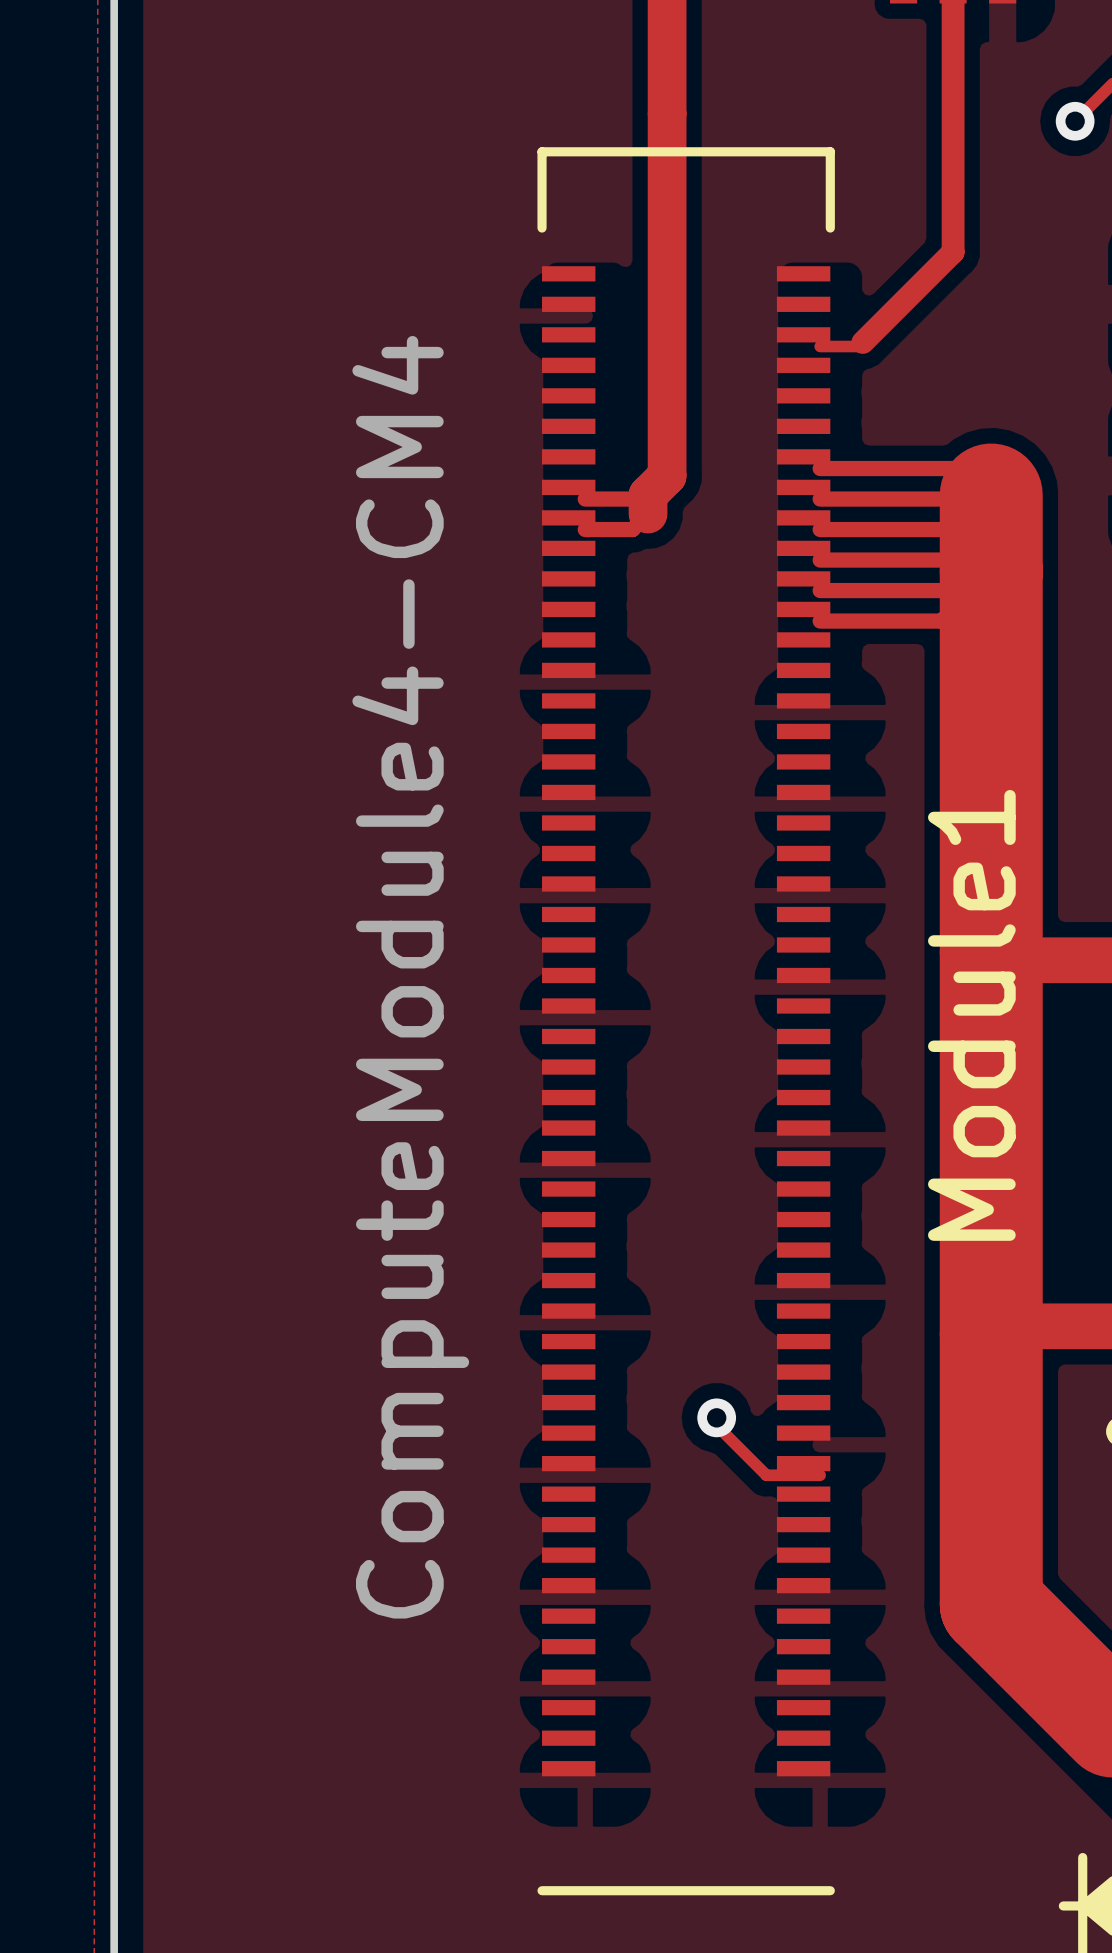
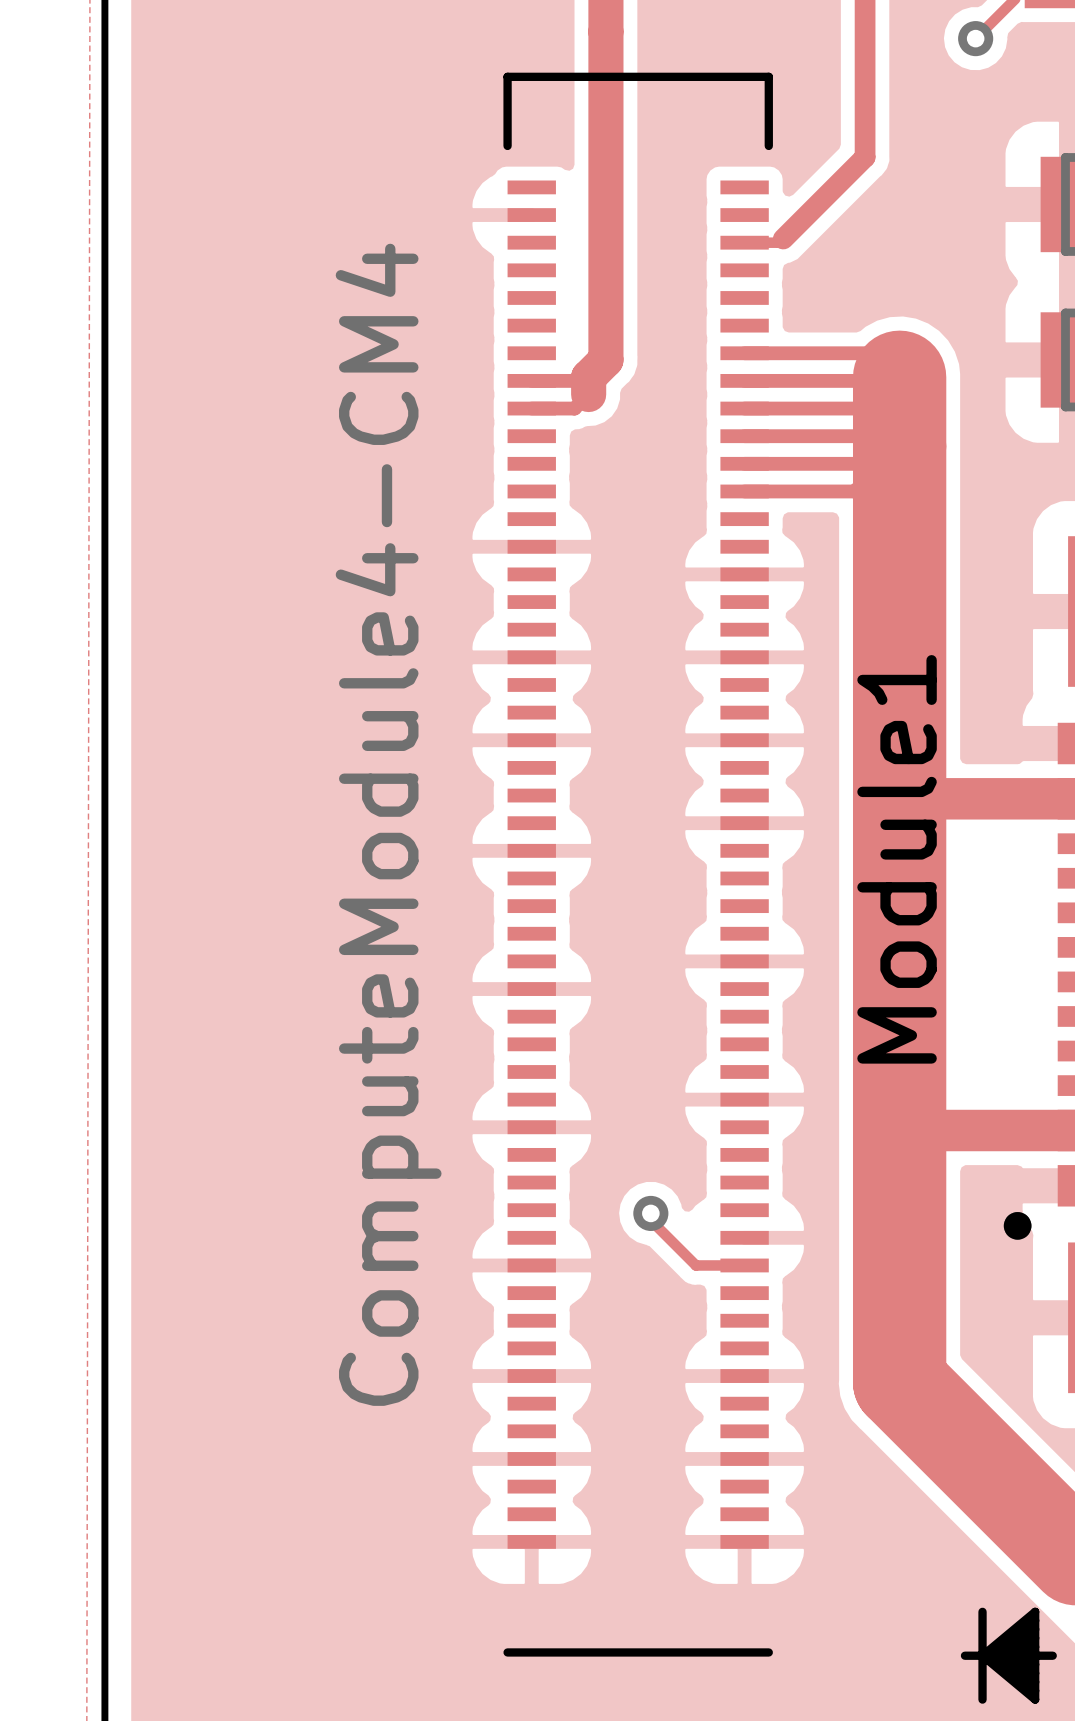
Module1 position: (686, 1021) -> (638, 864)

